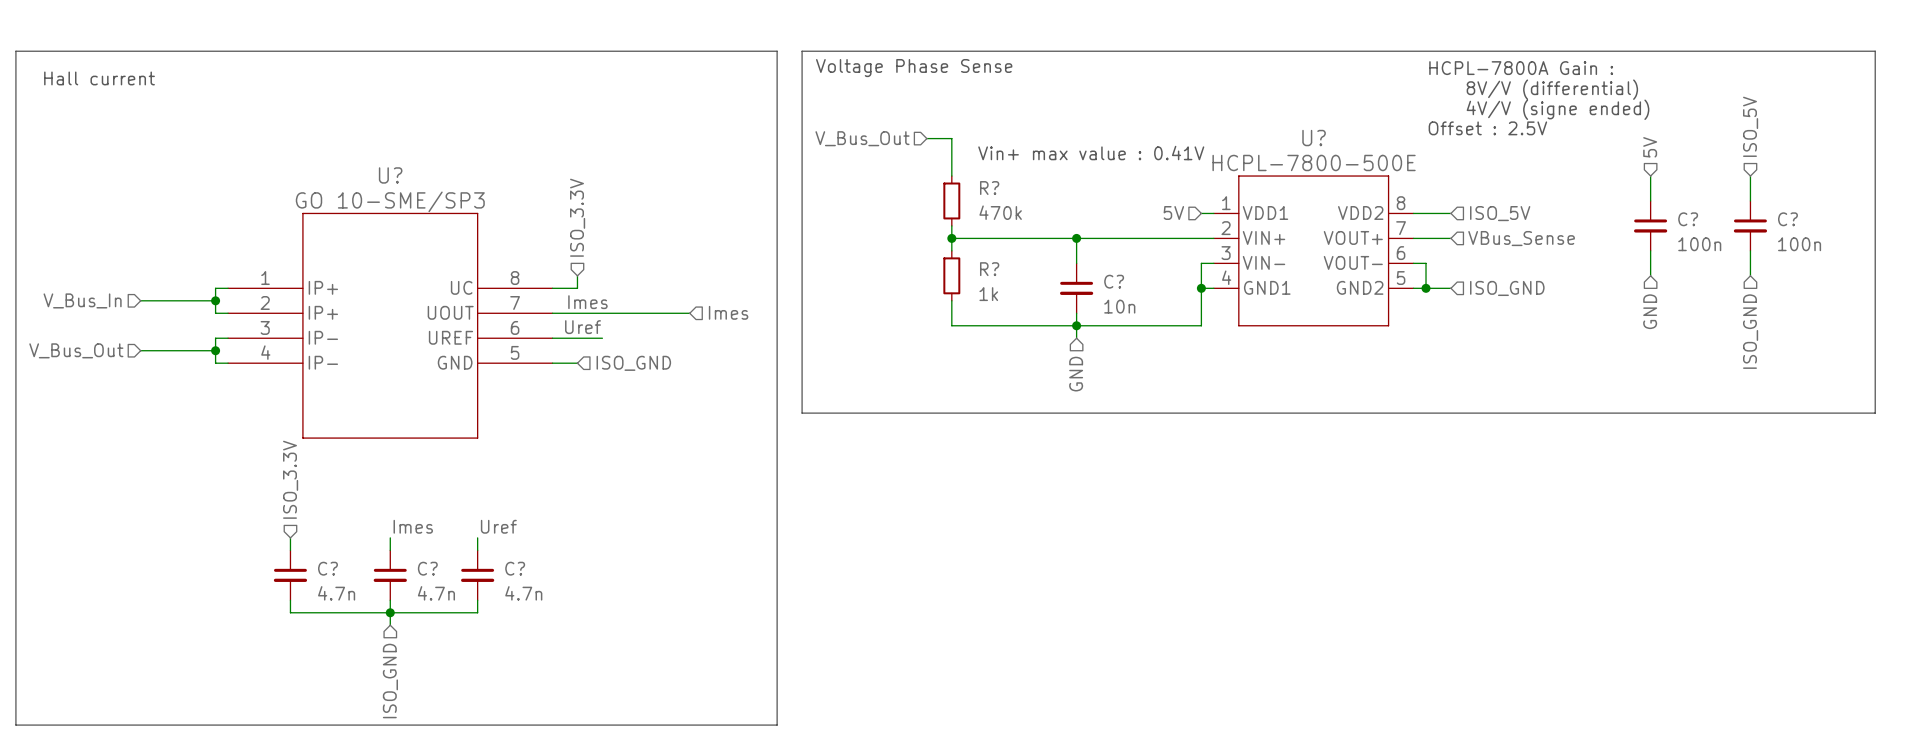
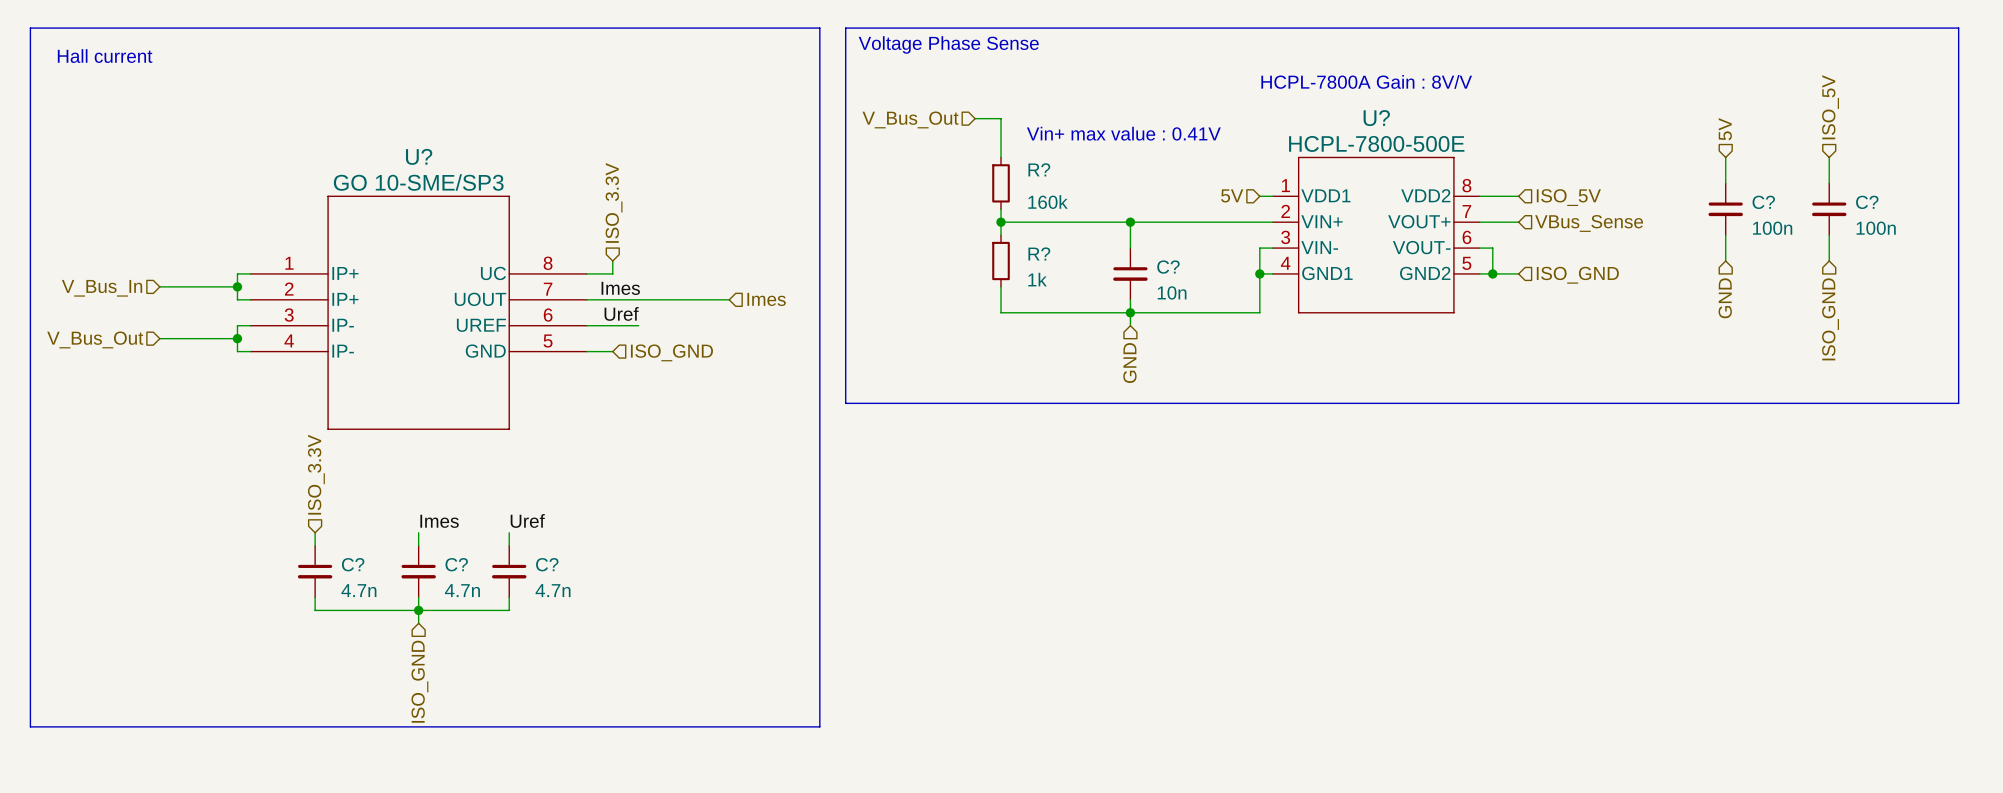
text: HCPL-7800A Gain : (1521, 68) -> none
text: 8V/V (differential) (1552, 89) -> none
text: none -> HCPL-7800A Gain : 8V/V (1366, 81)
text: 4V/V (signe ended) (1558, 109) -> none
text: Offset : 2.5V (1487, 128) -> none
R? value: 470k (1000, 212) -> 160k (1048, 202)

